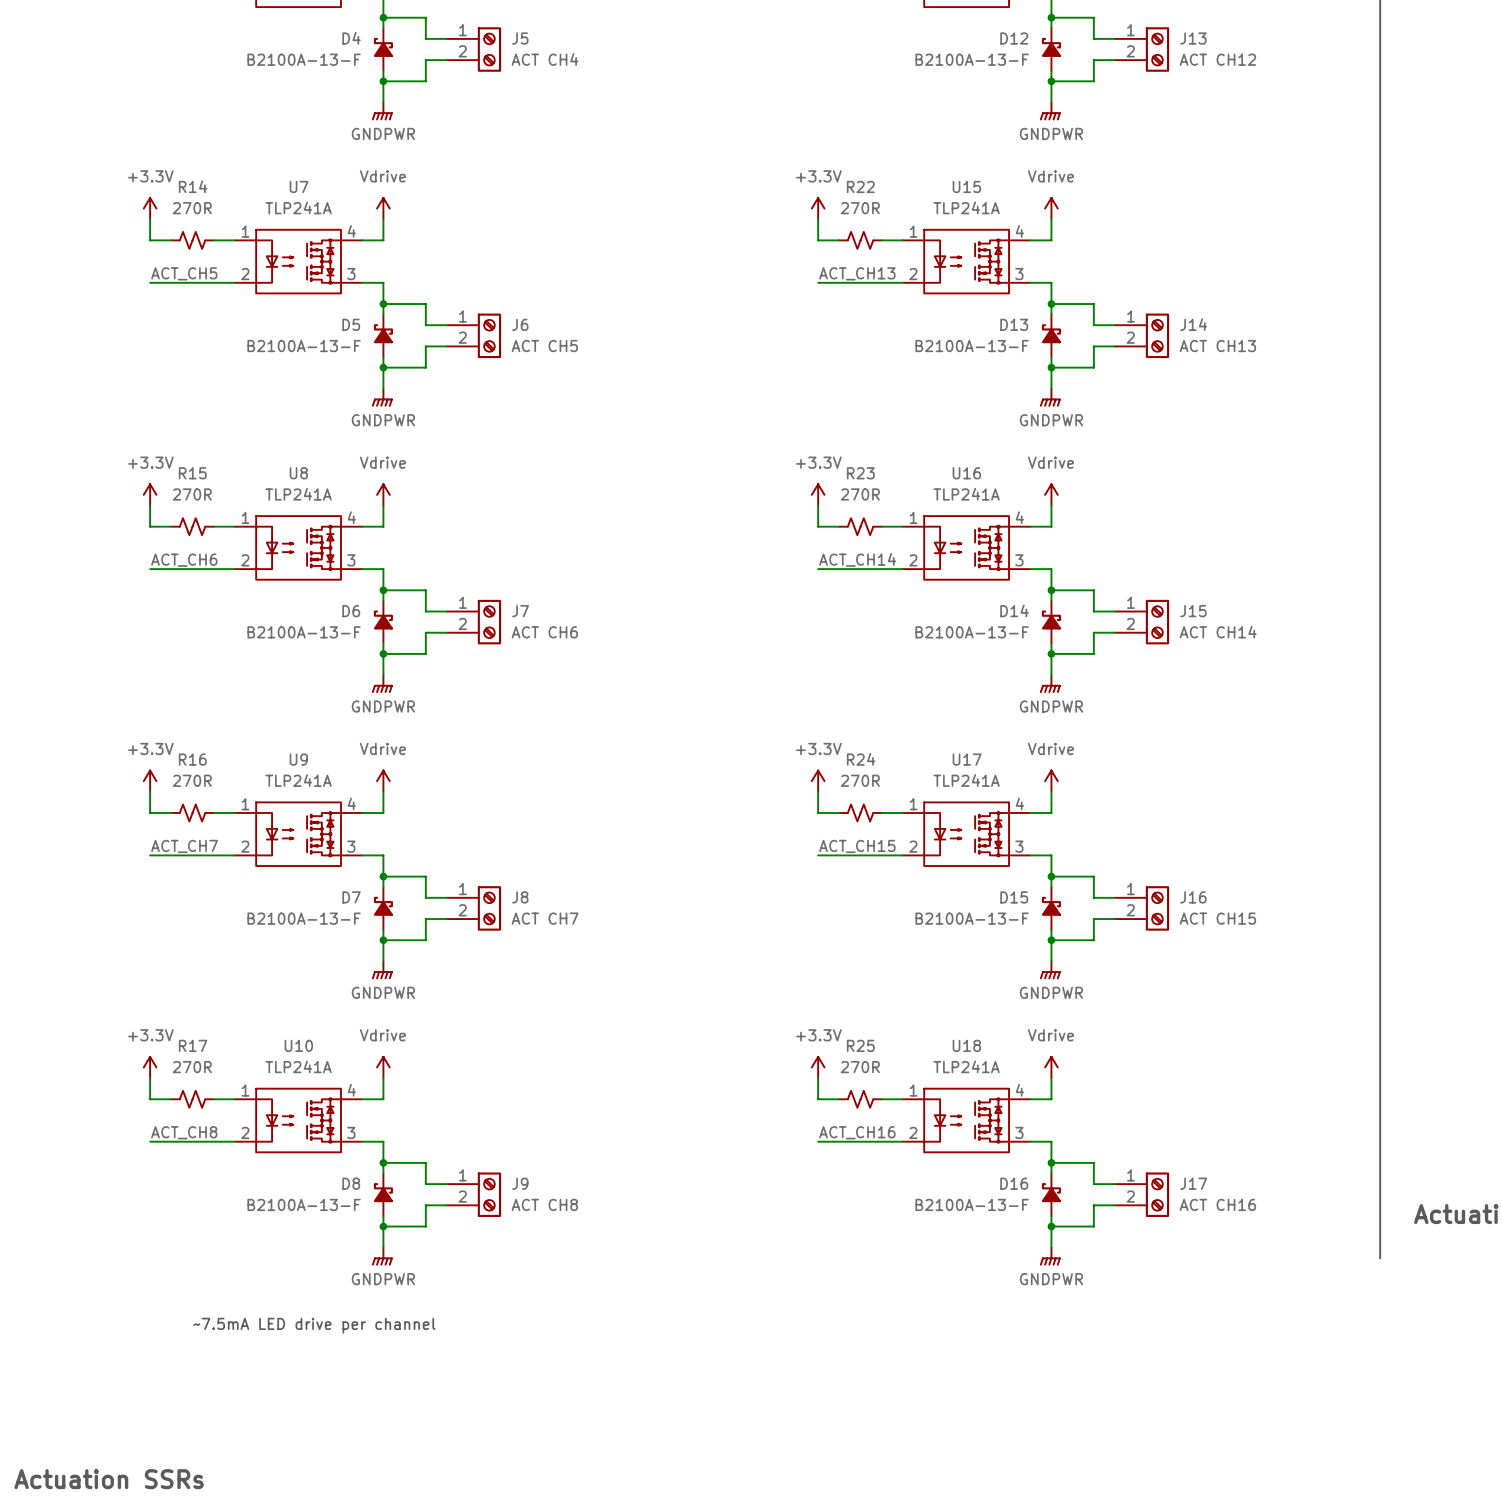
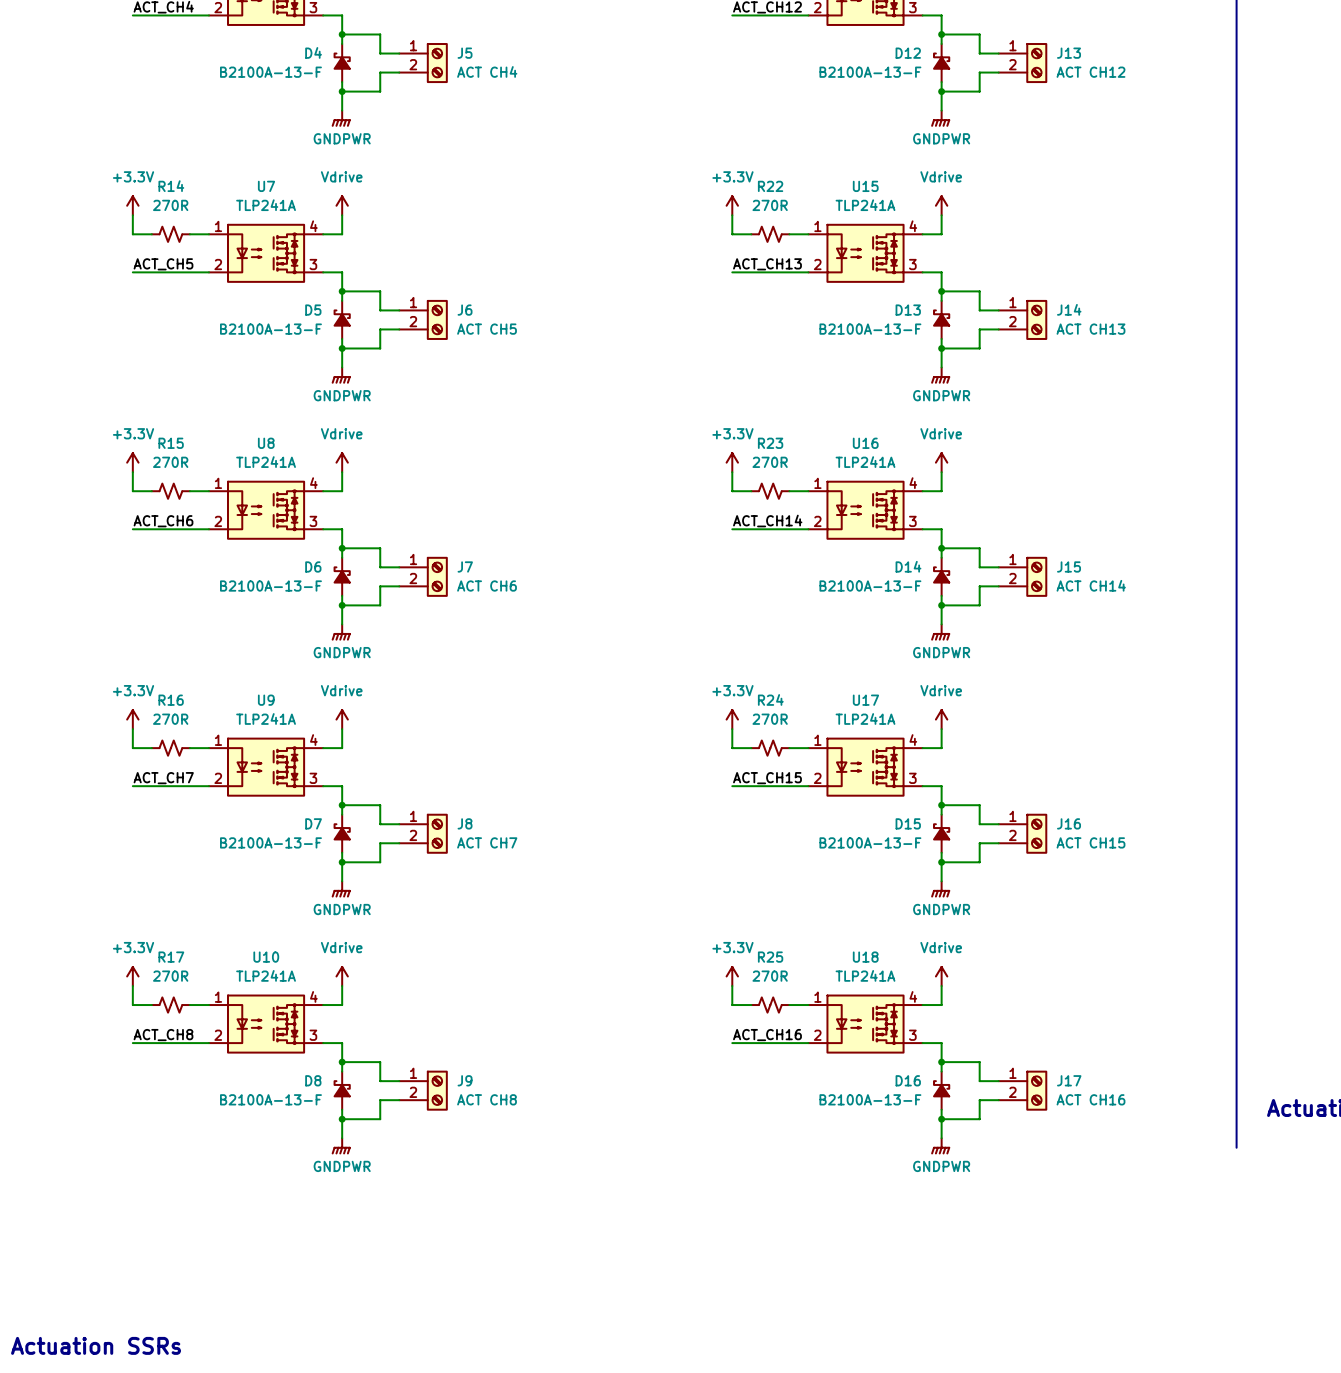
text: ~7.5mA LED drive per channel (314, 1325) -> none

